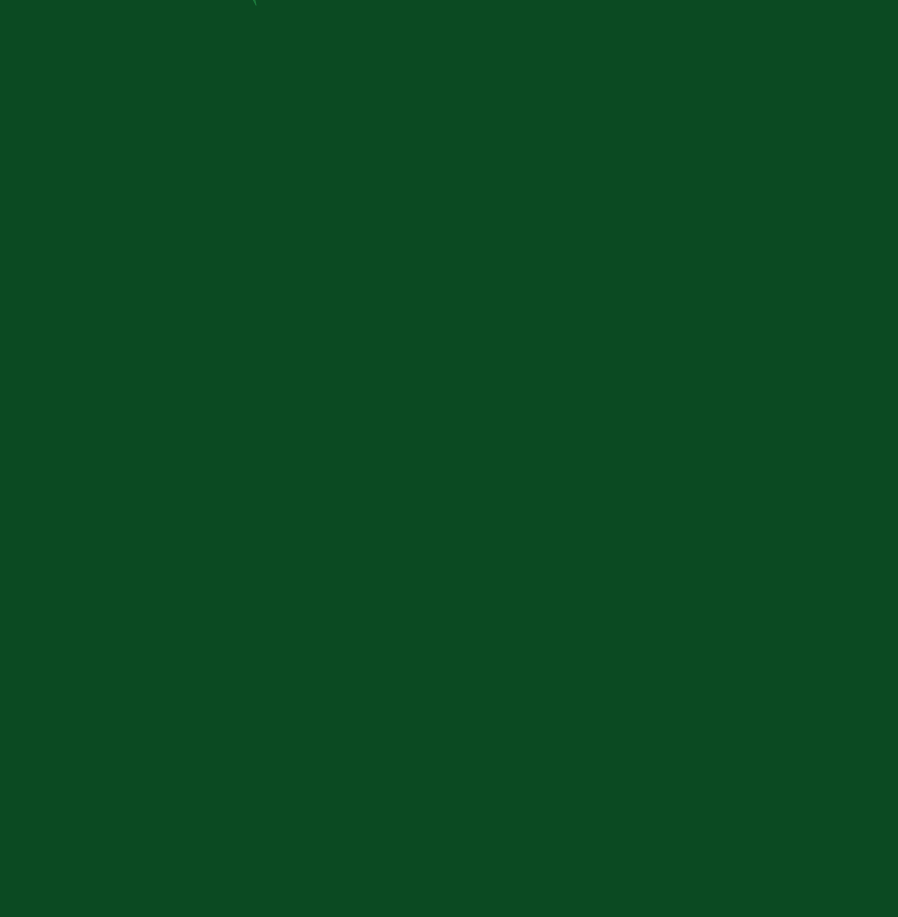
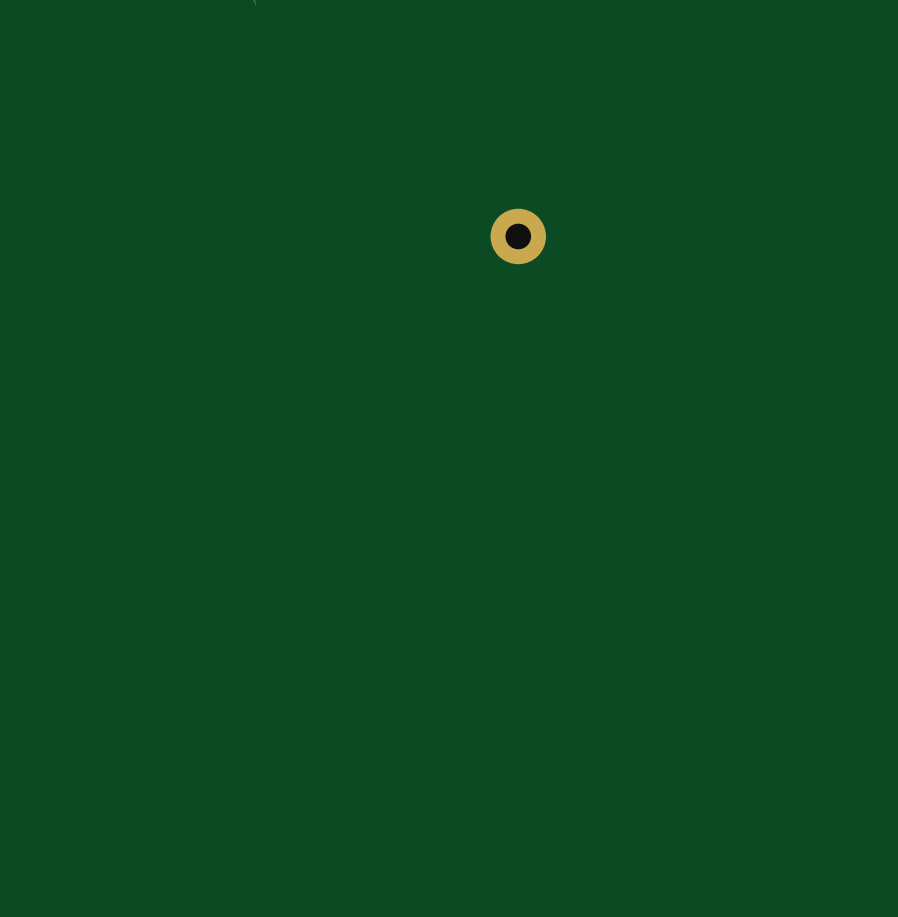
via: none -> (518, 236)

